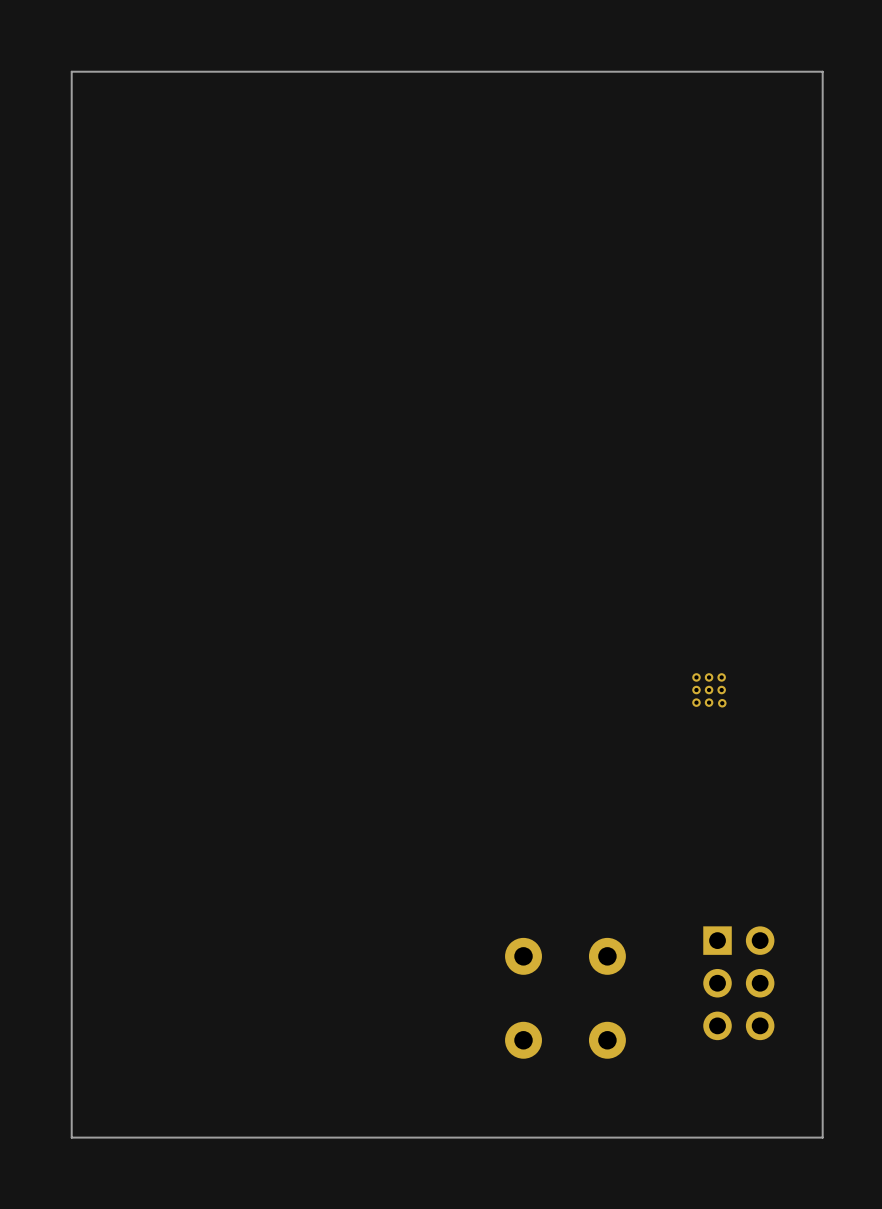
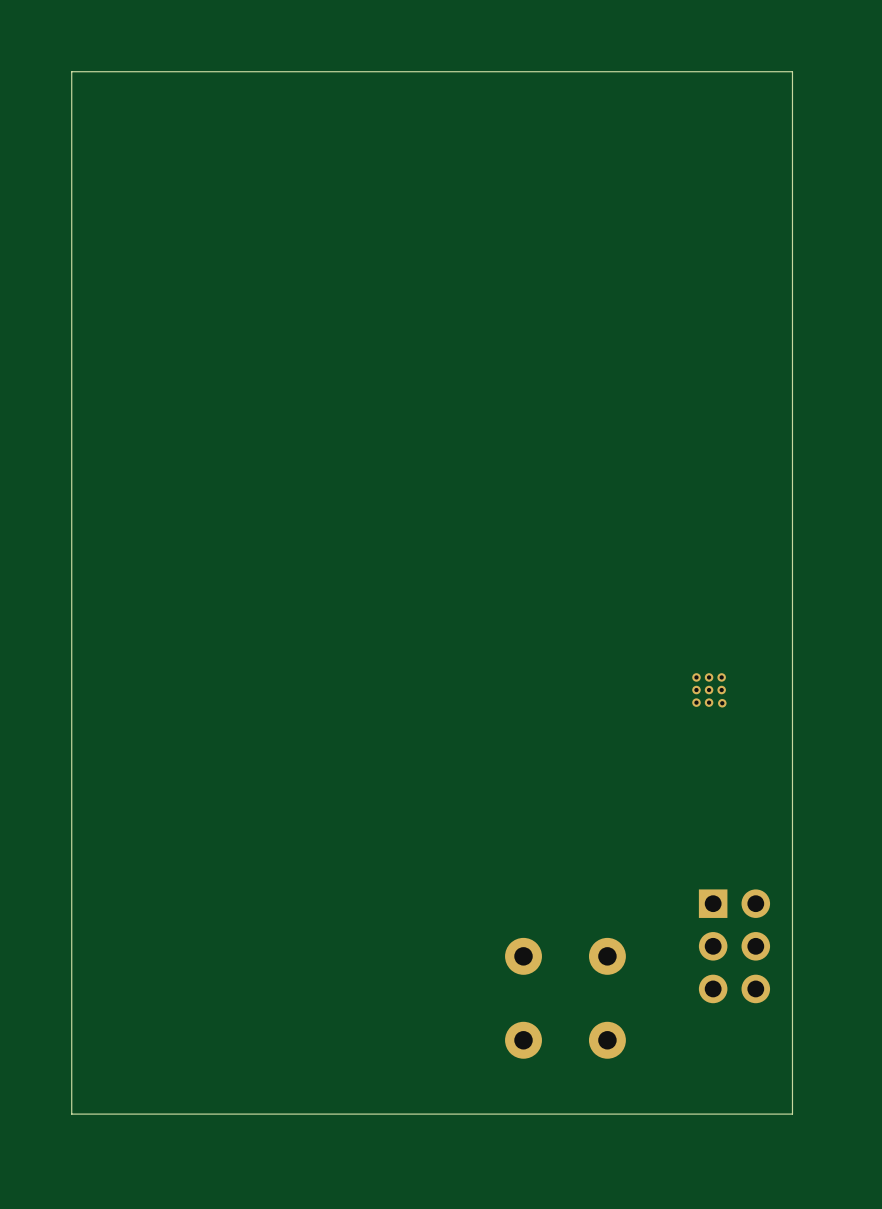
board edge: (792, 71) (822, 71) (822, 1137) (71, 1137) (71, 1114) -> (792, 71) (792, 1114) (71, 1114)
part position: (738, 983) -> (734, 946)

